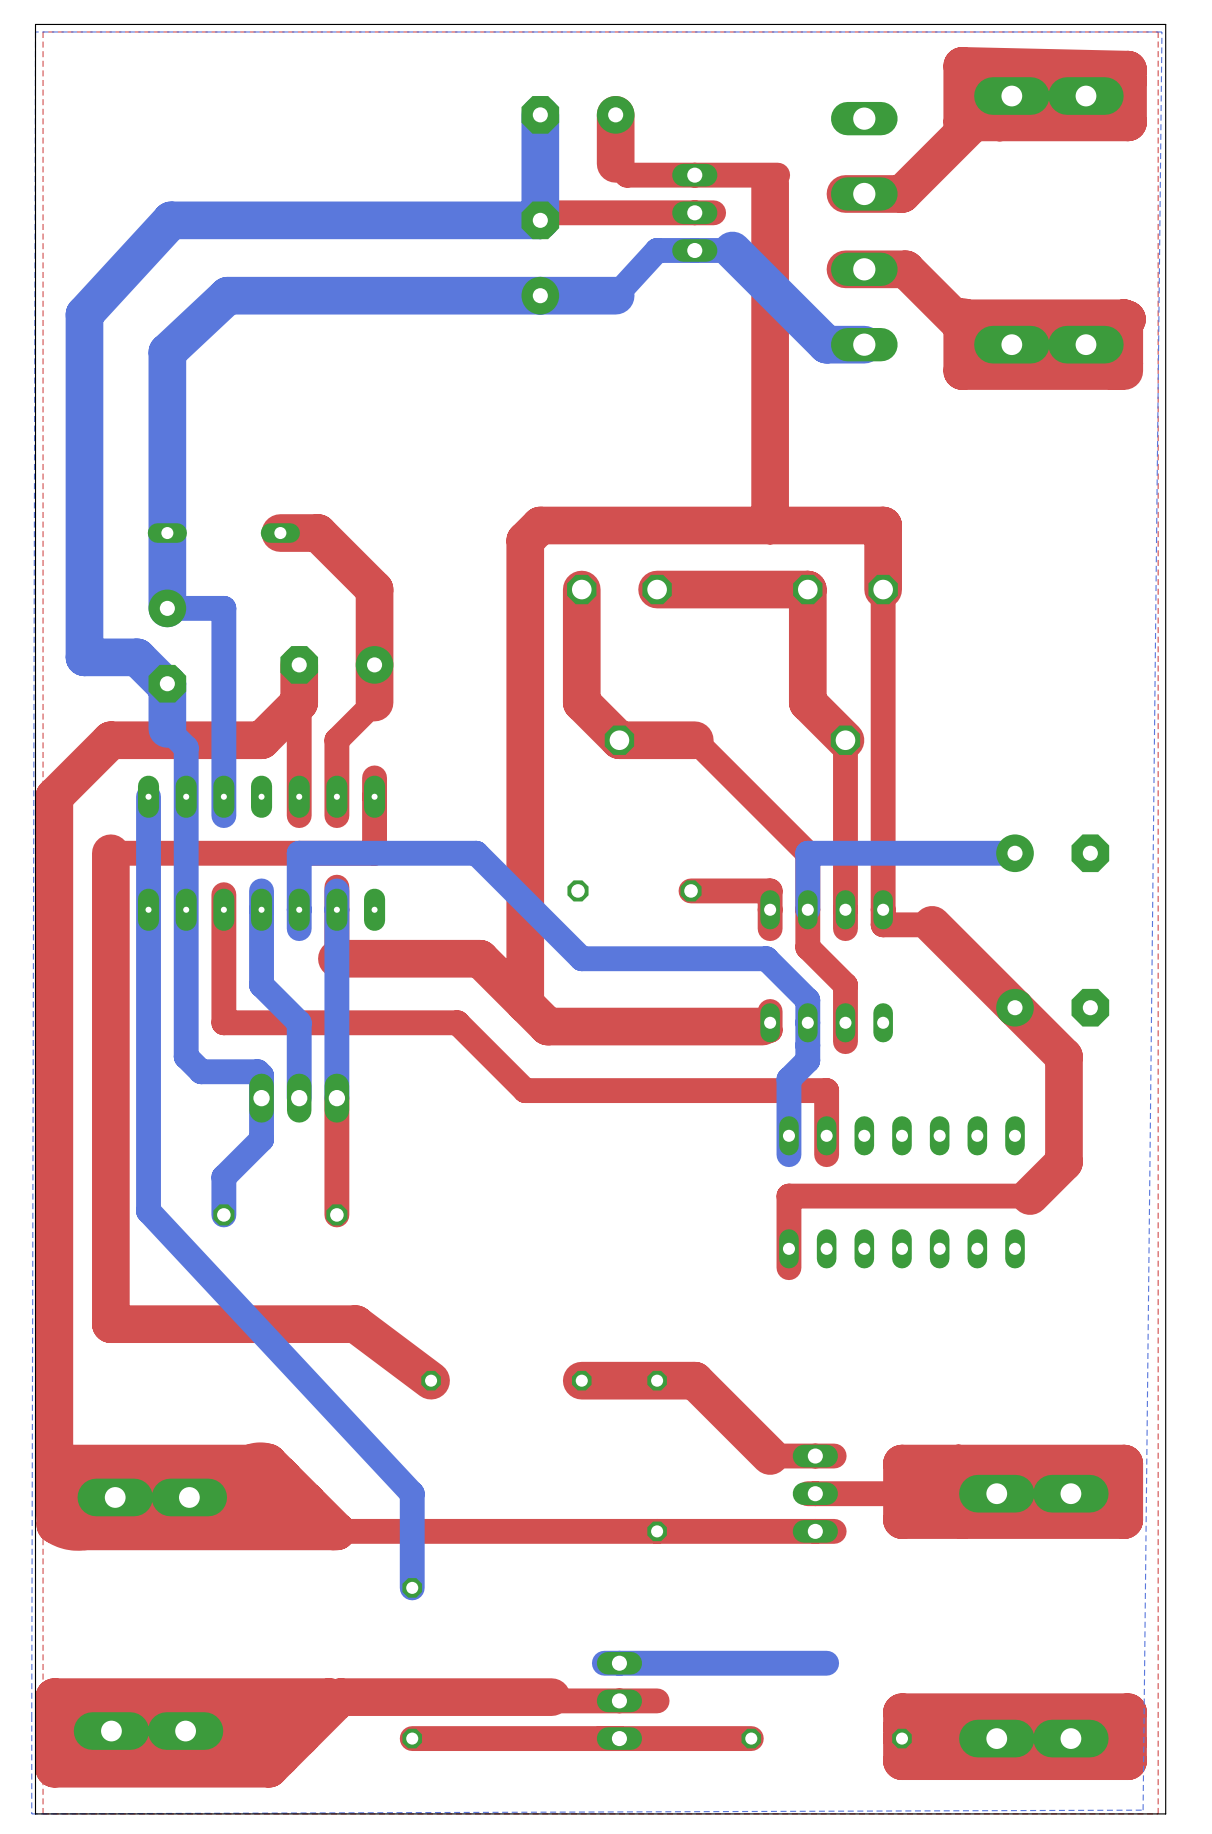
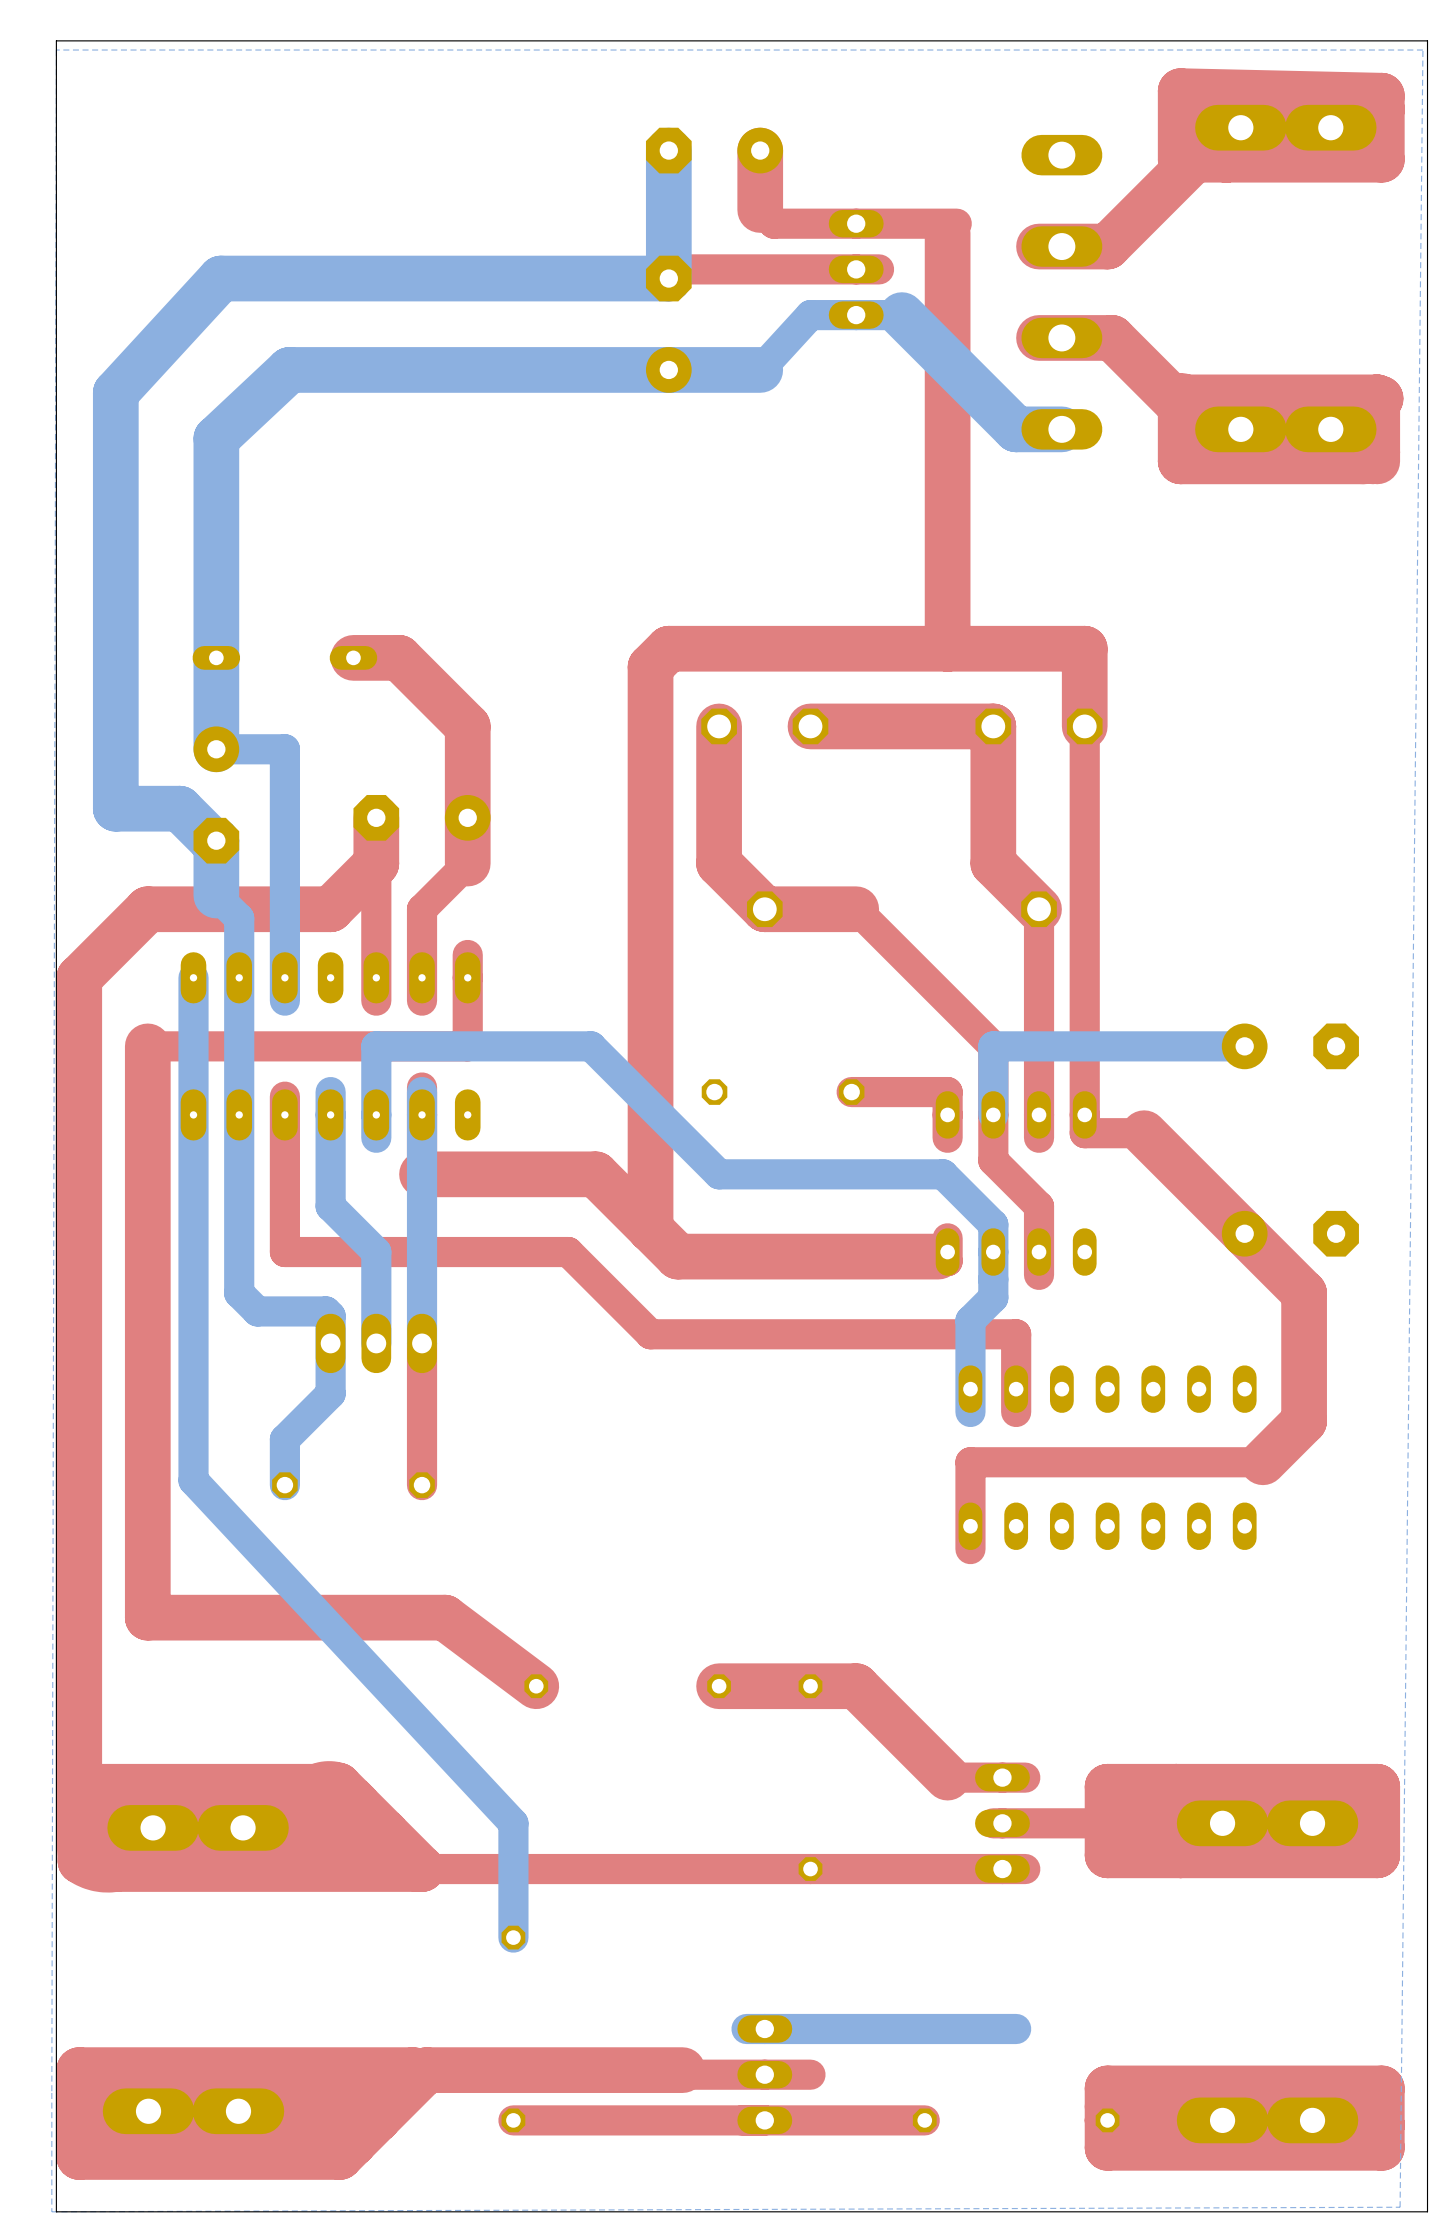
top zone outline: (1158, 31) (43, 31) (43, 1813) (1158, 1813) (1158, 31) -> none

